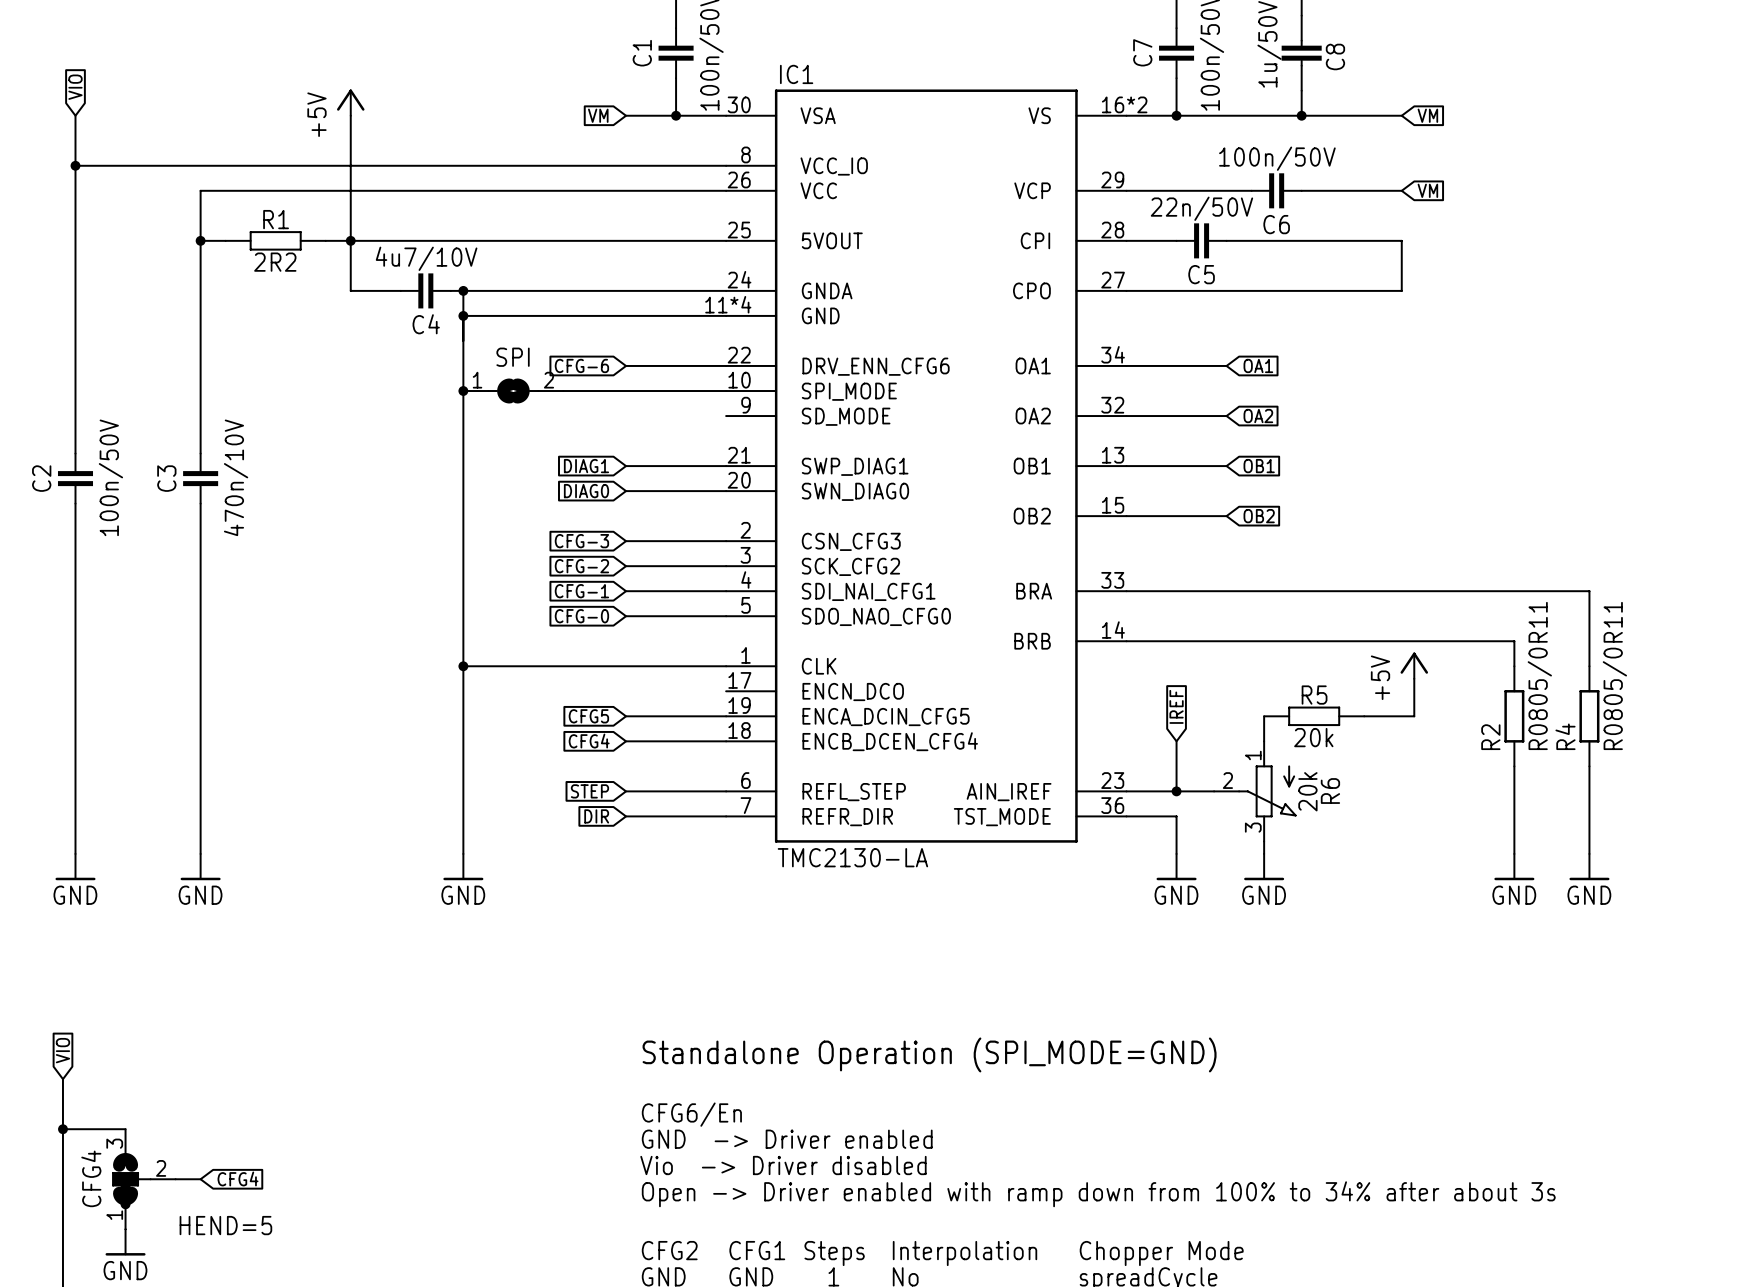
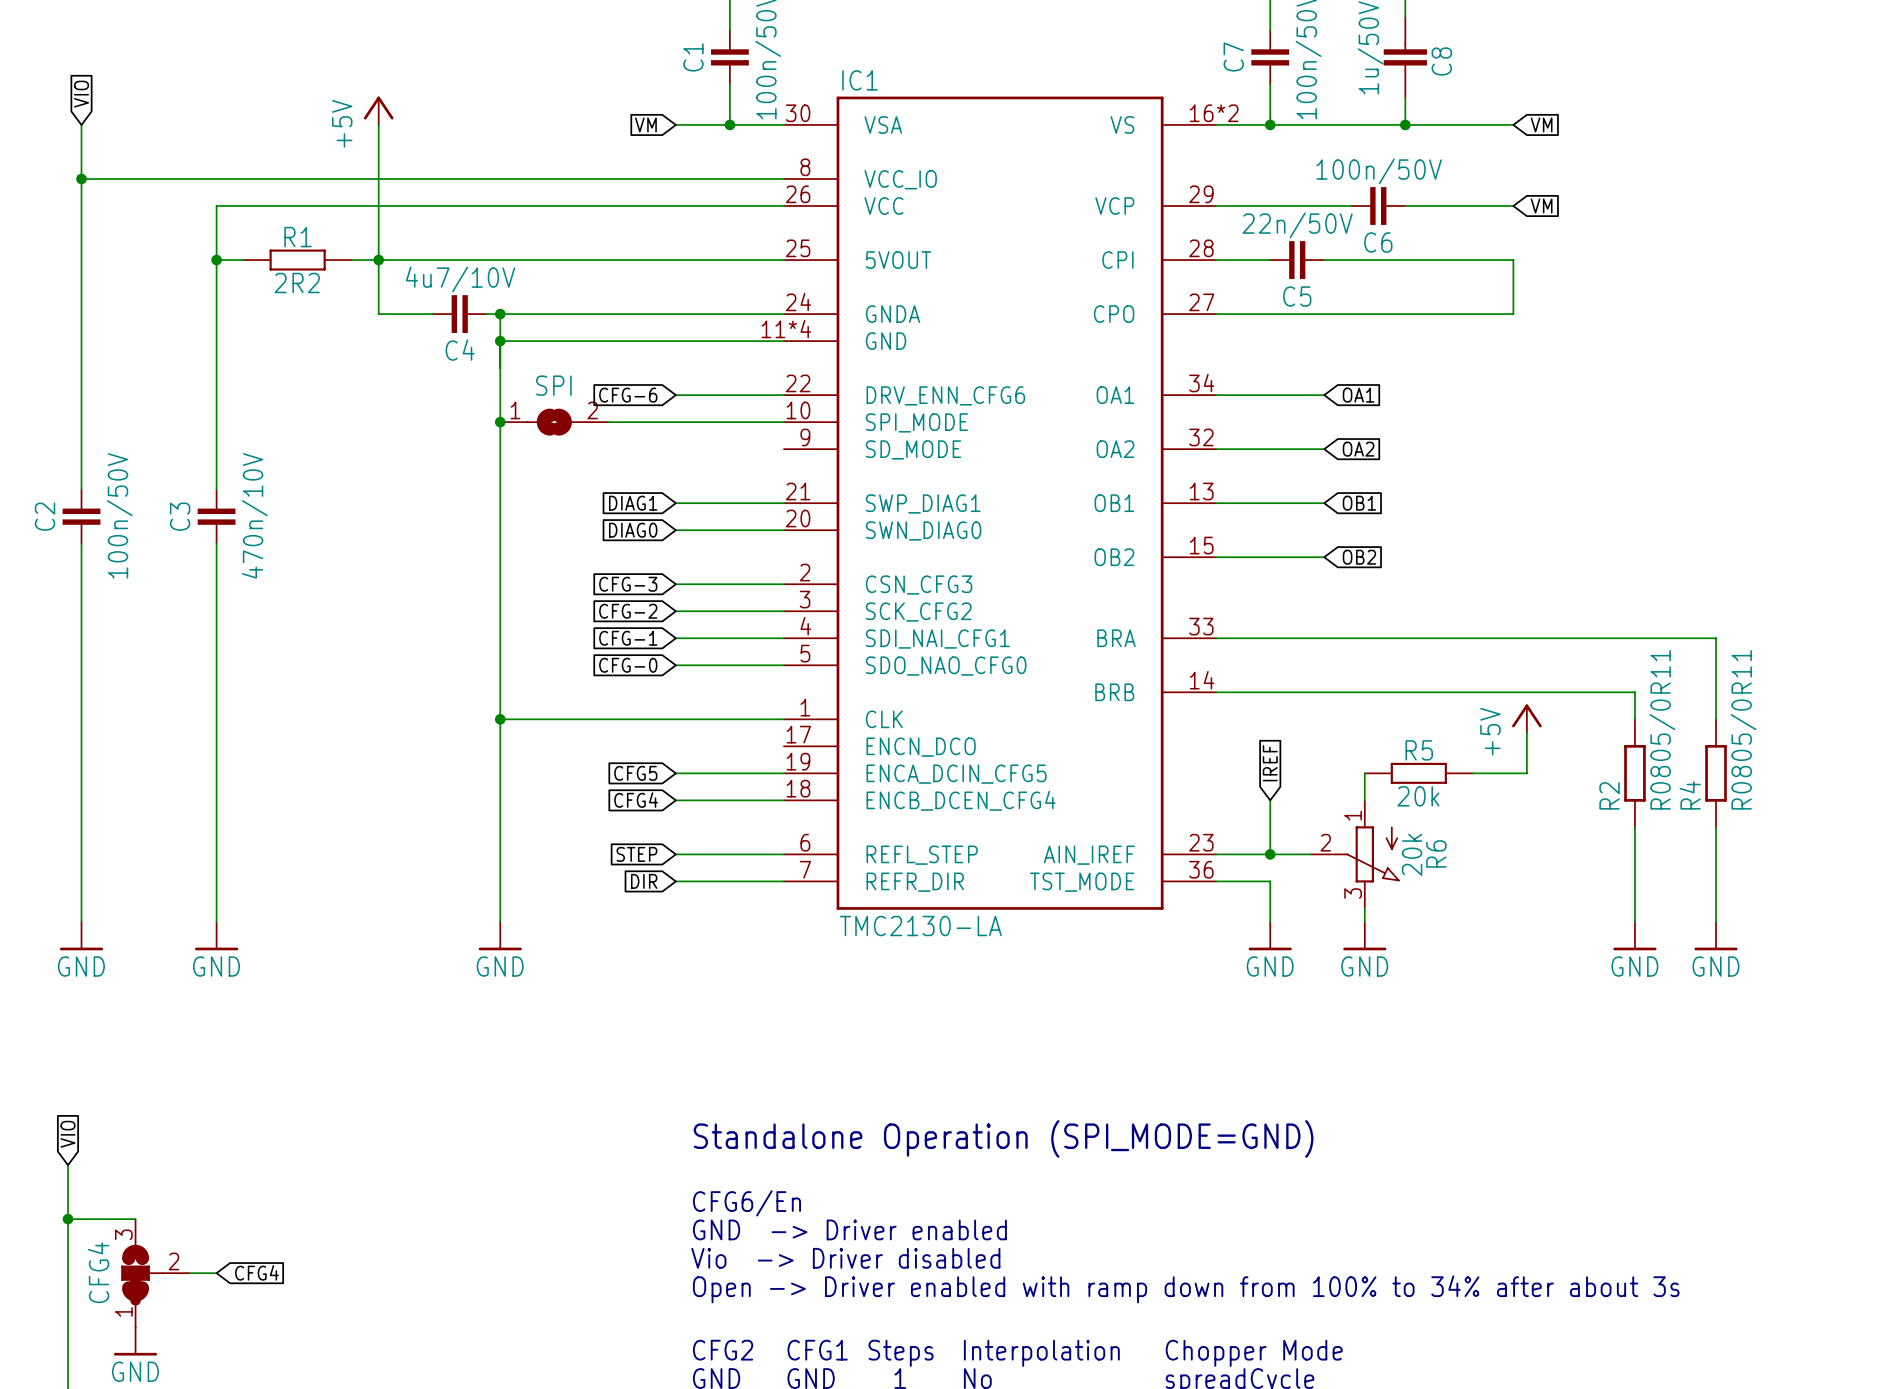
text: HEND=5 (225, 1225) -> none

